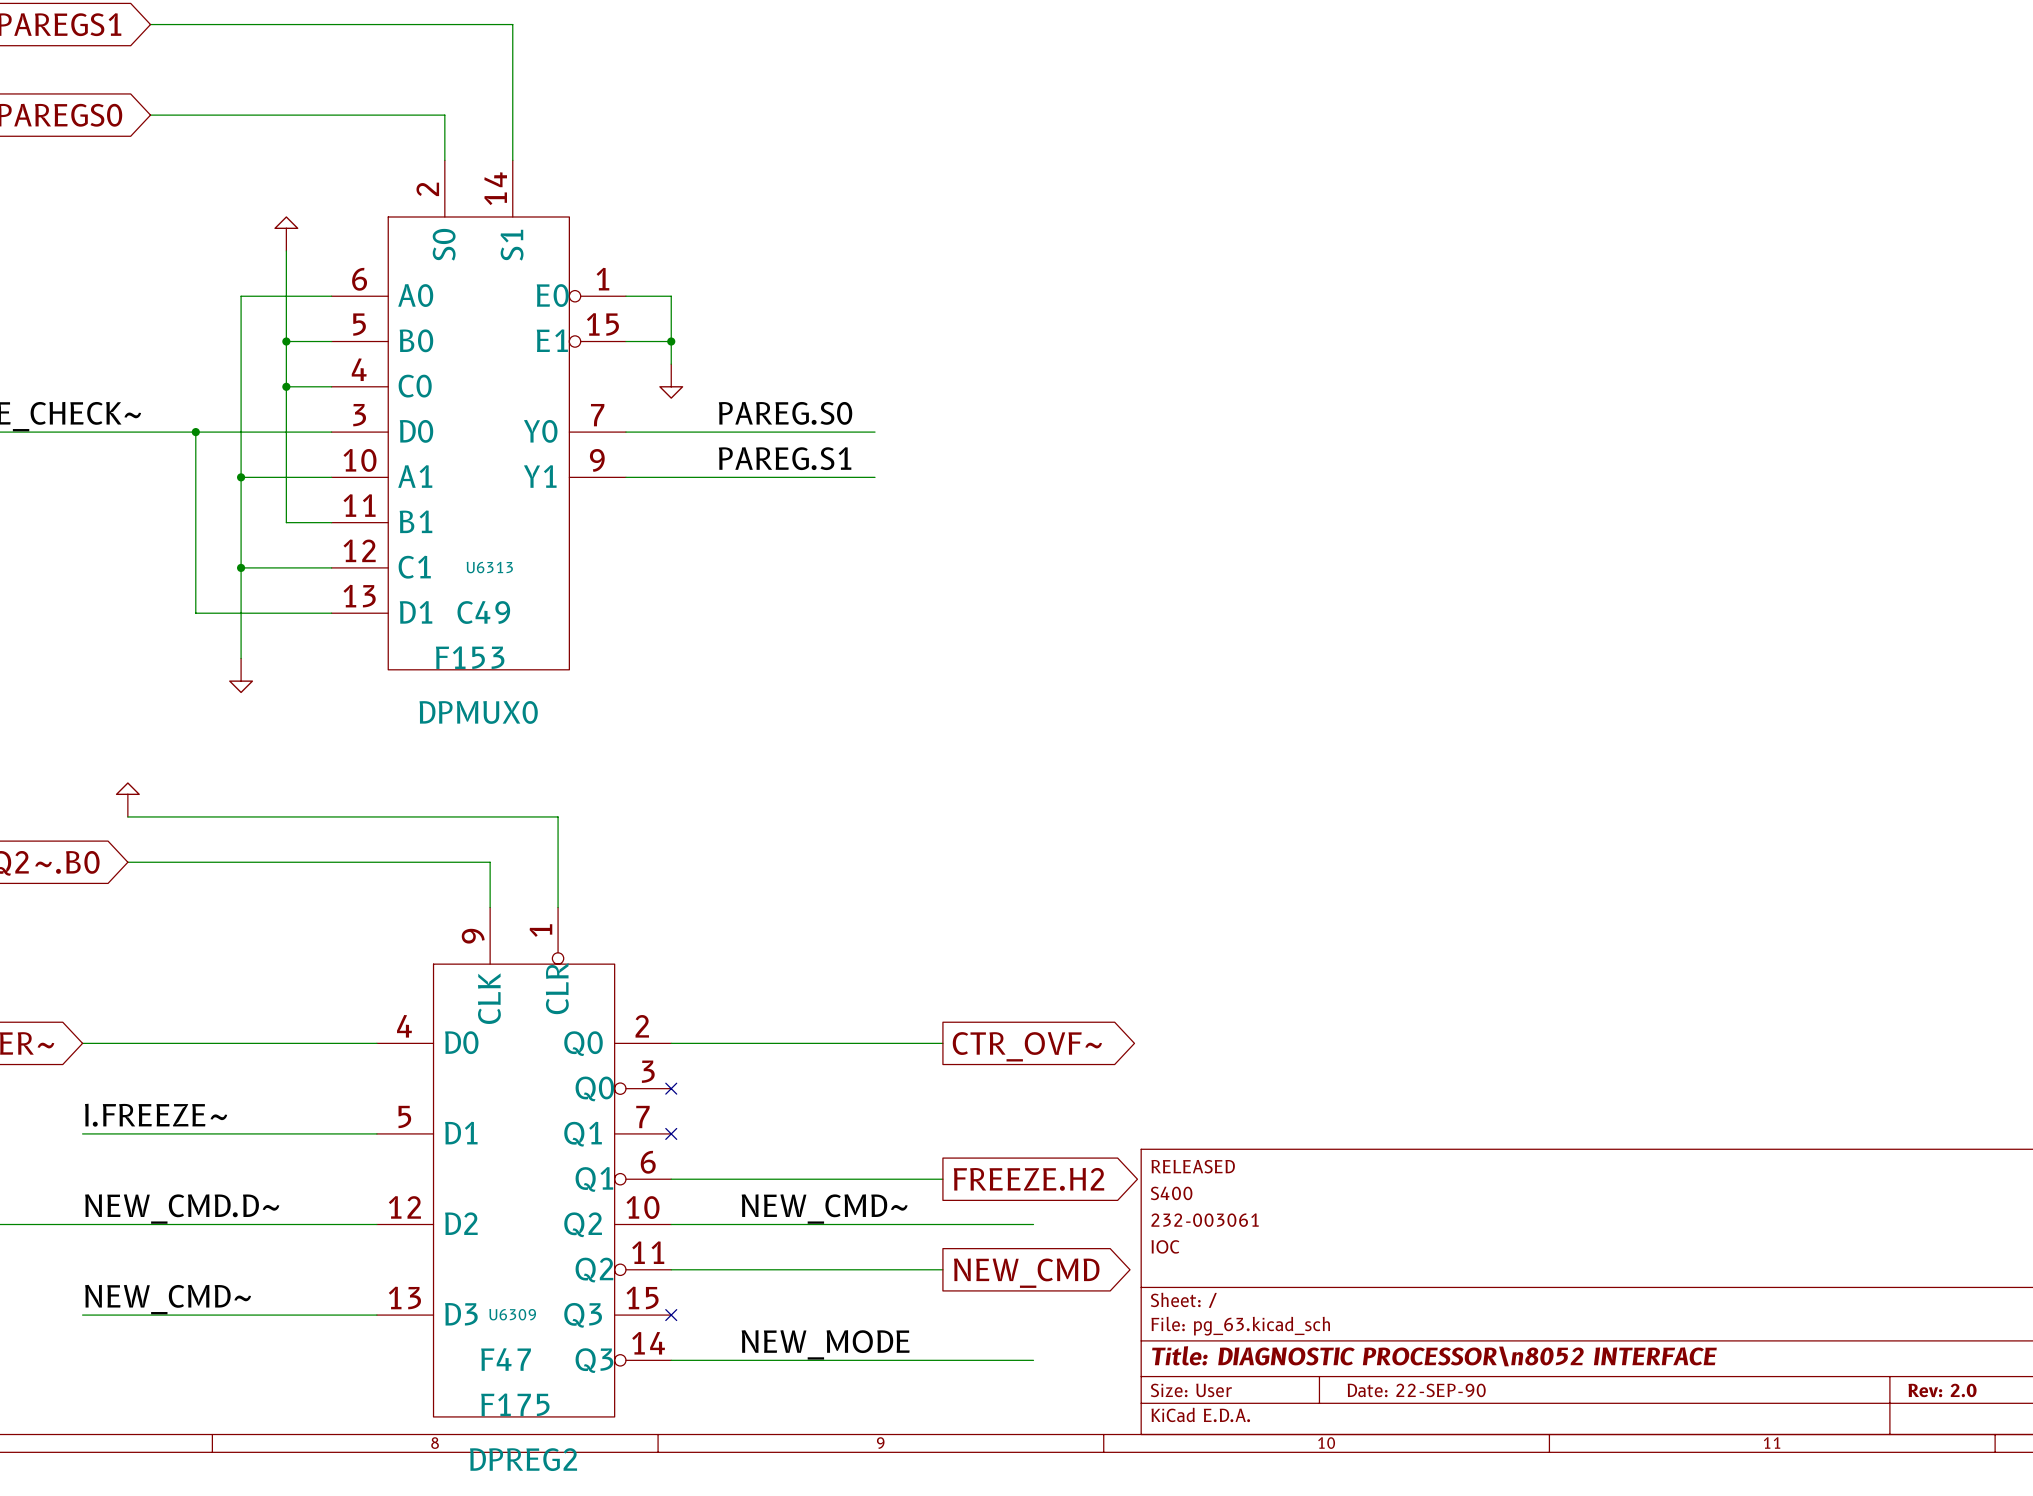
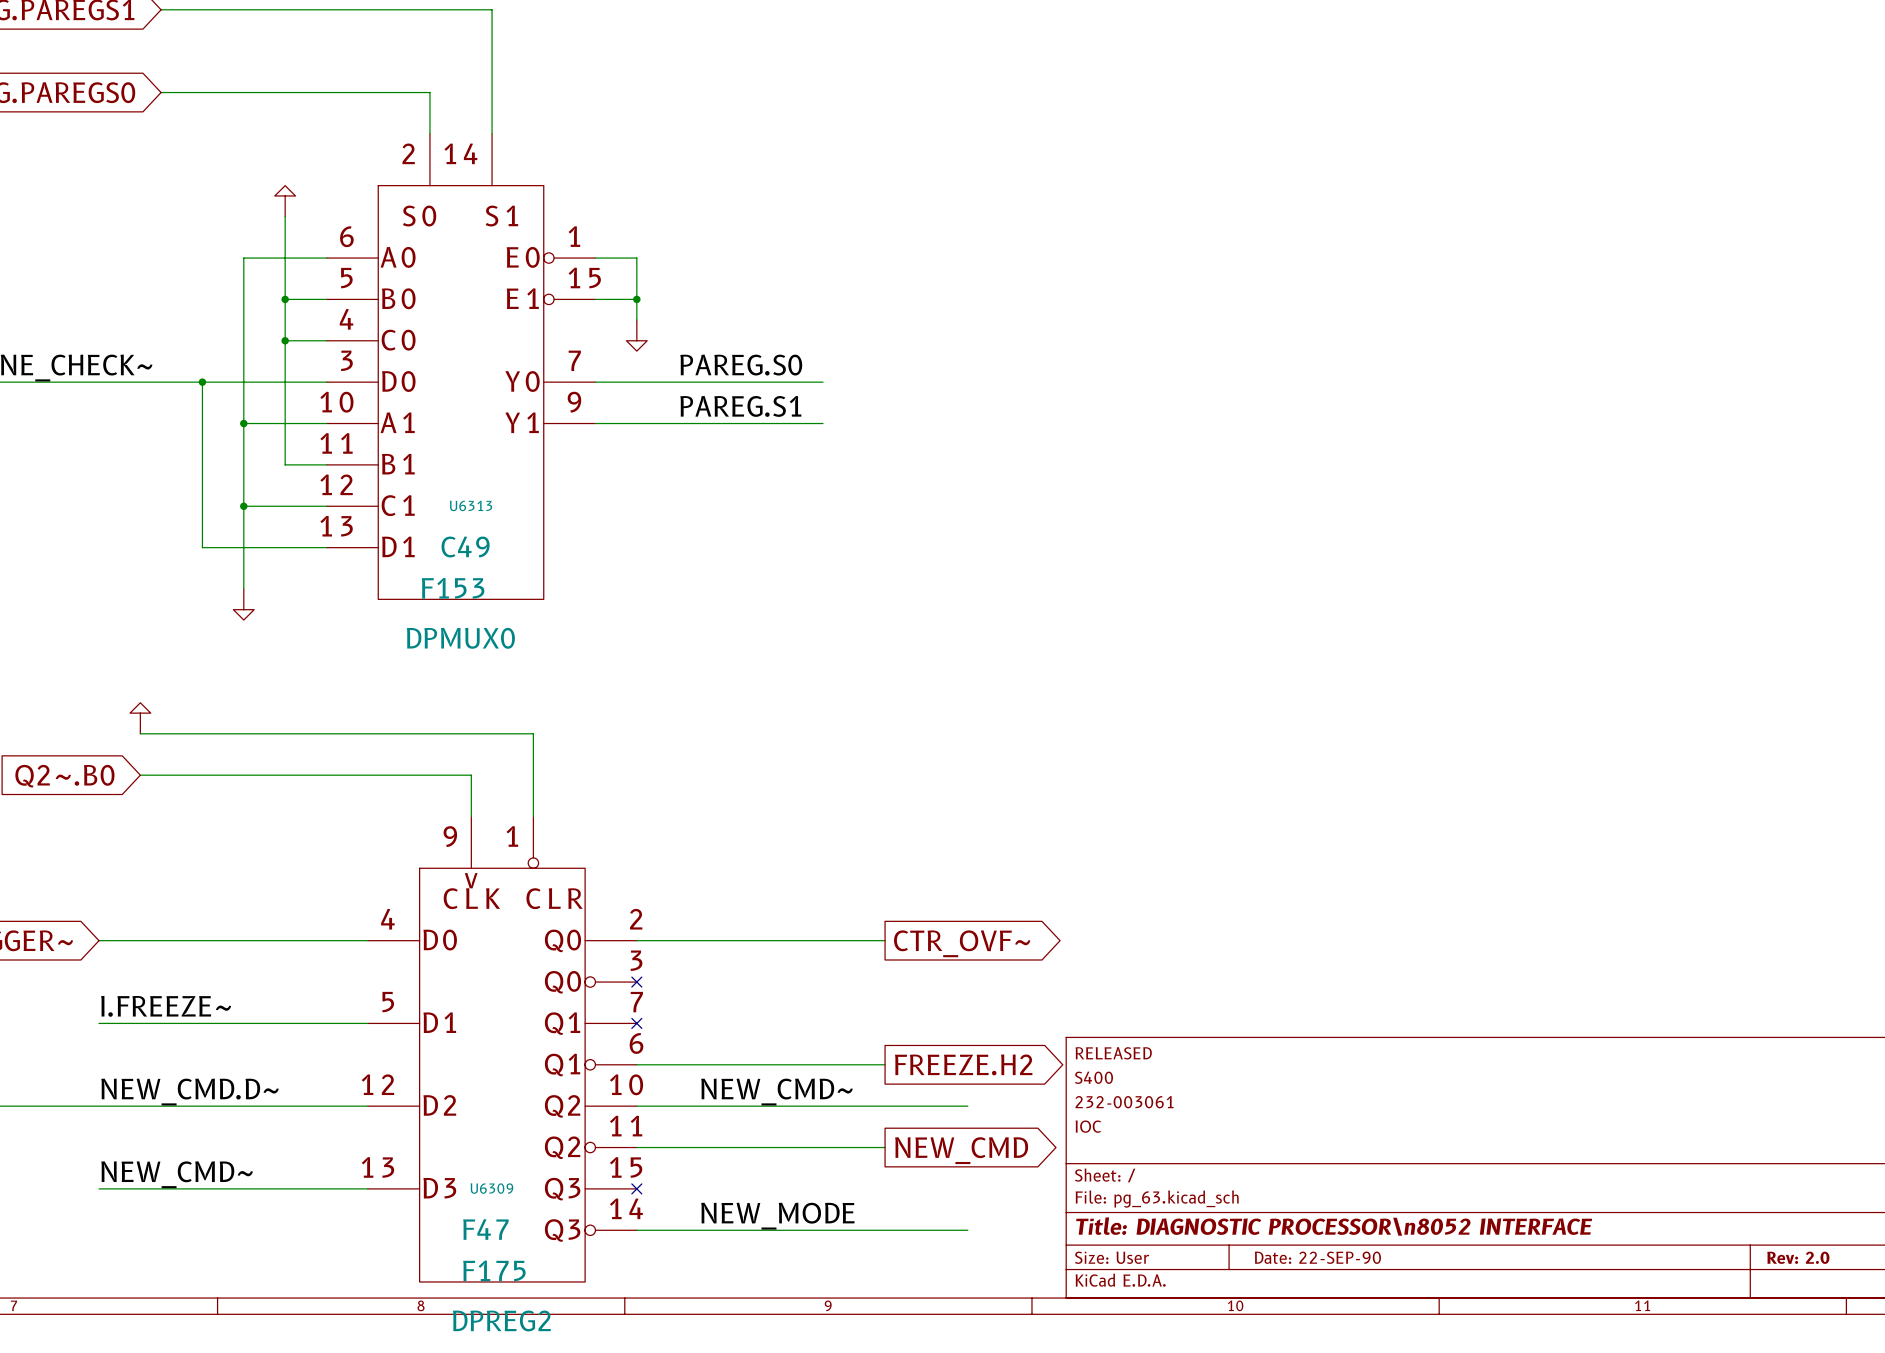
U6313 symbol: [331, 160, 626, 670] -> [326, 133, 596, 600]
U6309 symbol: [376, 907, 672, 1417] -> [367, 816, 637, 1282]

